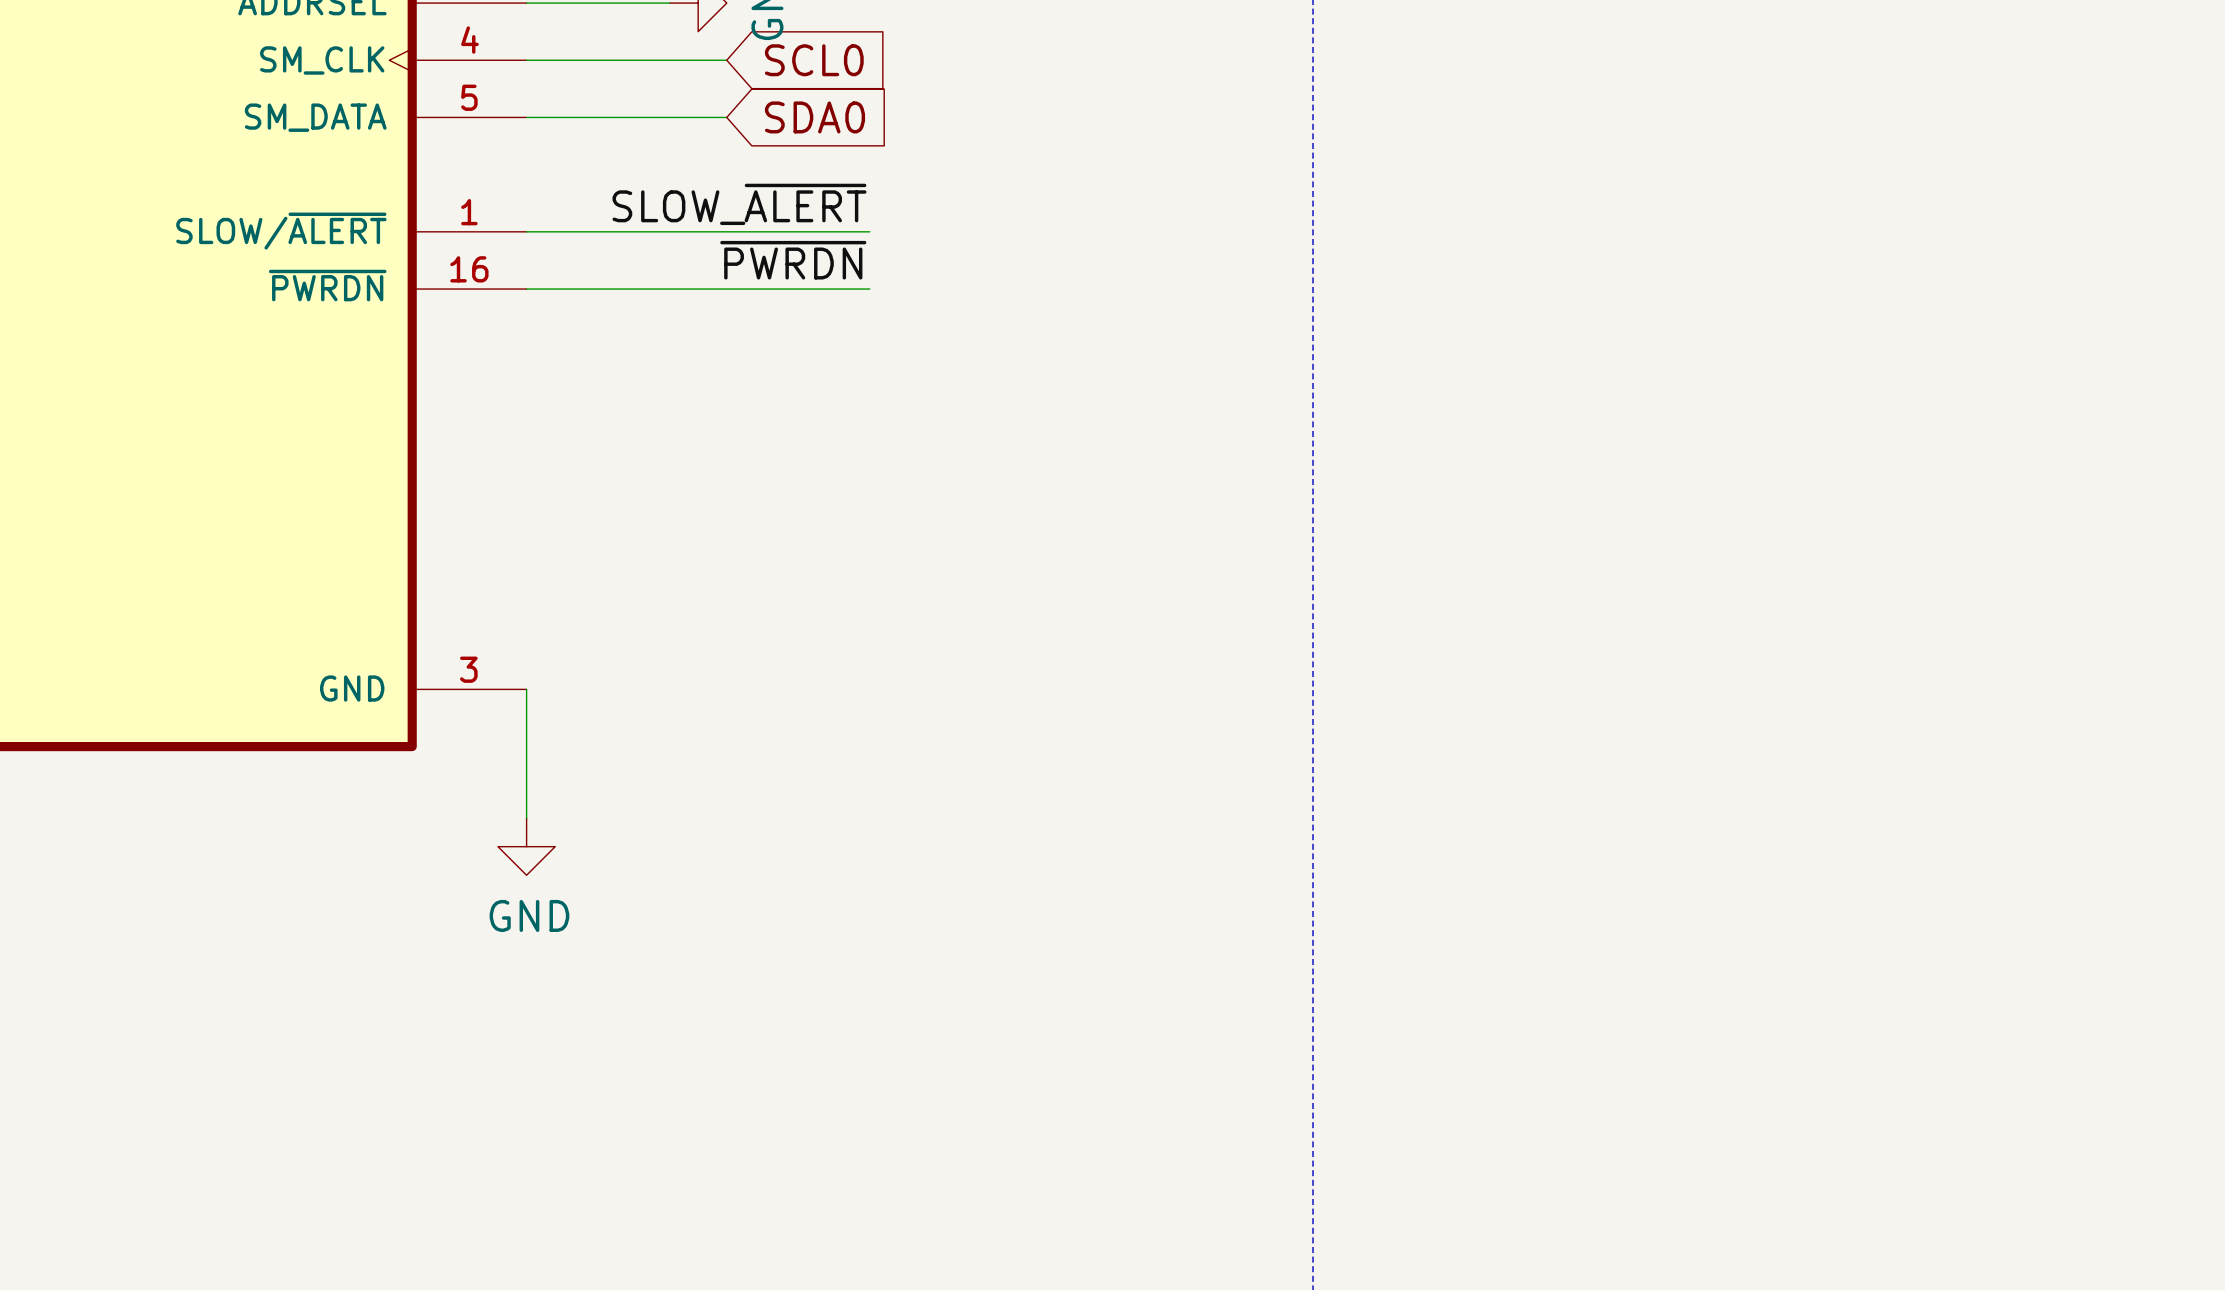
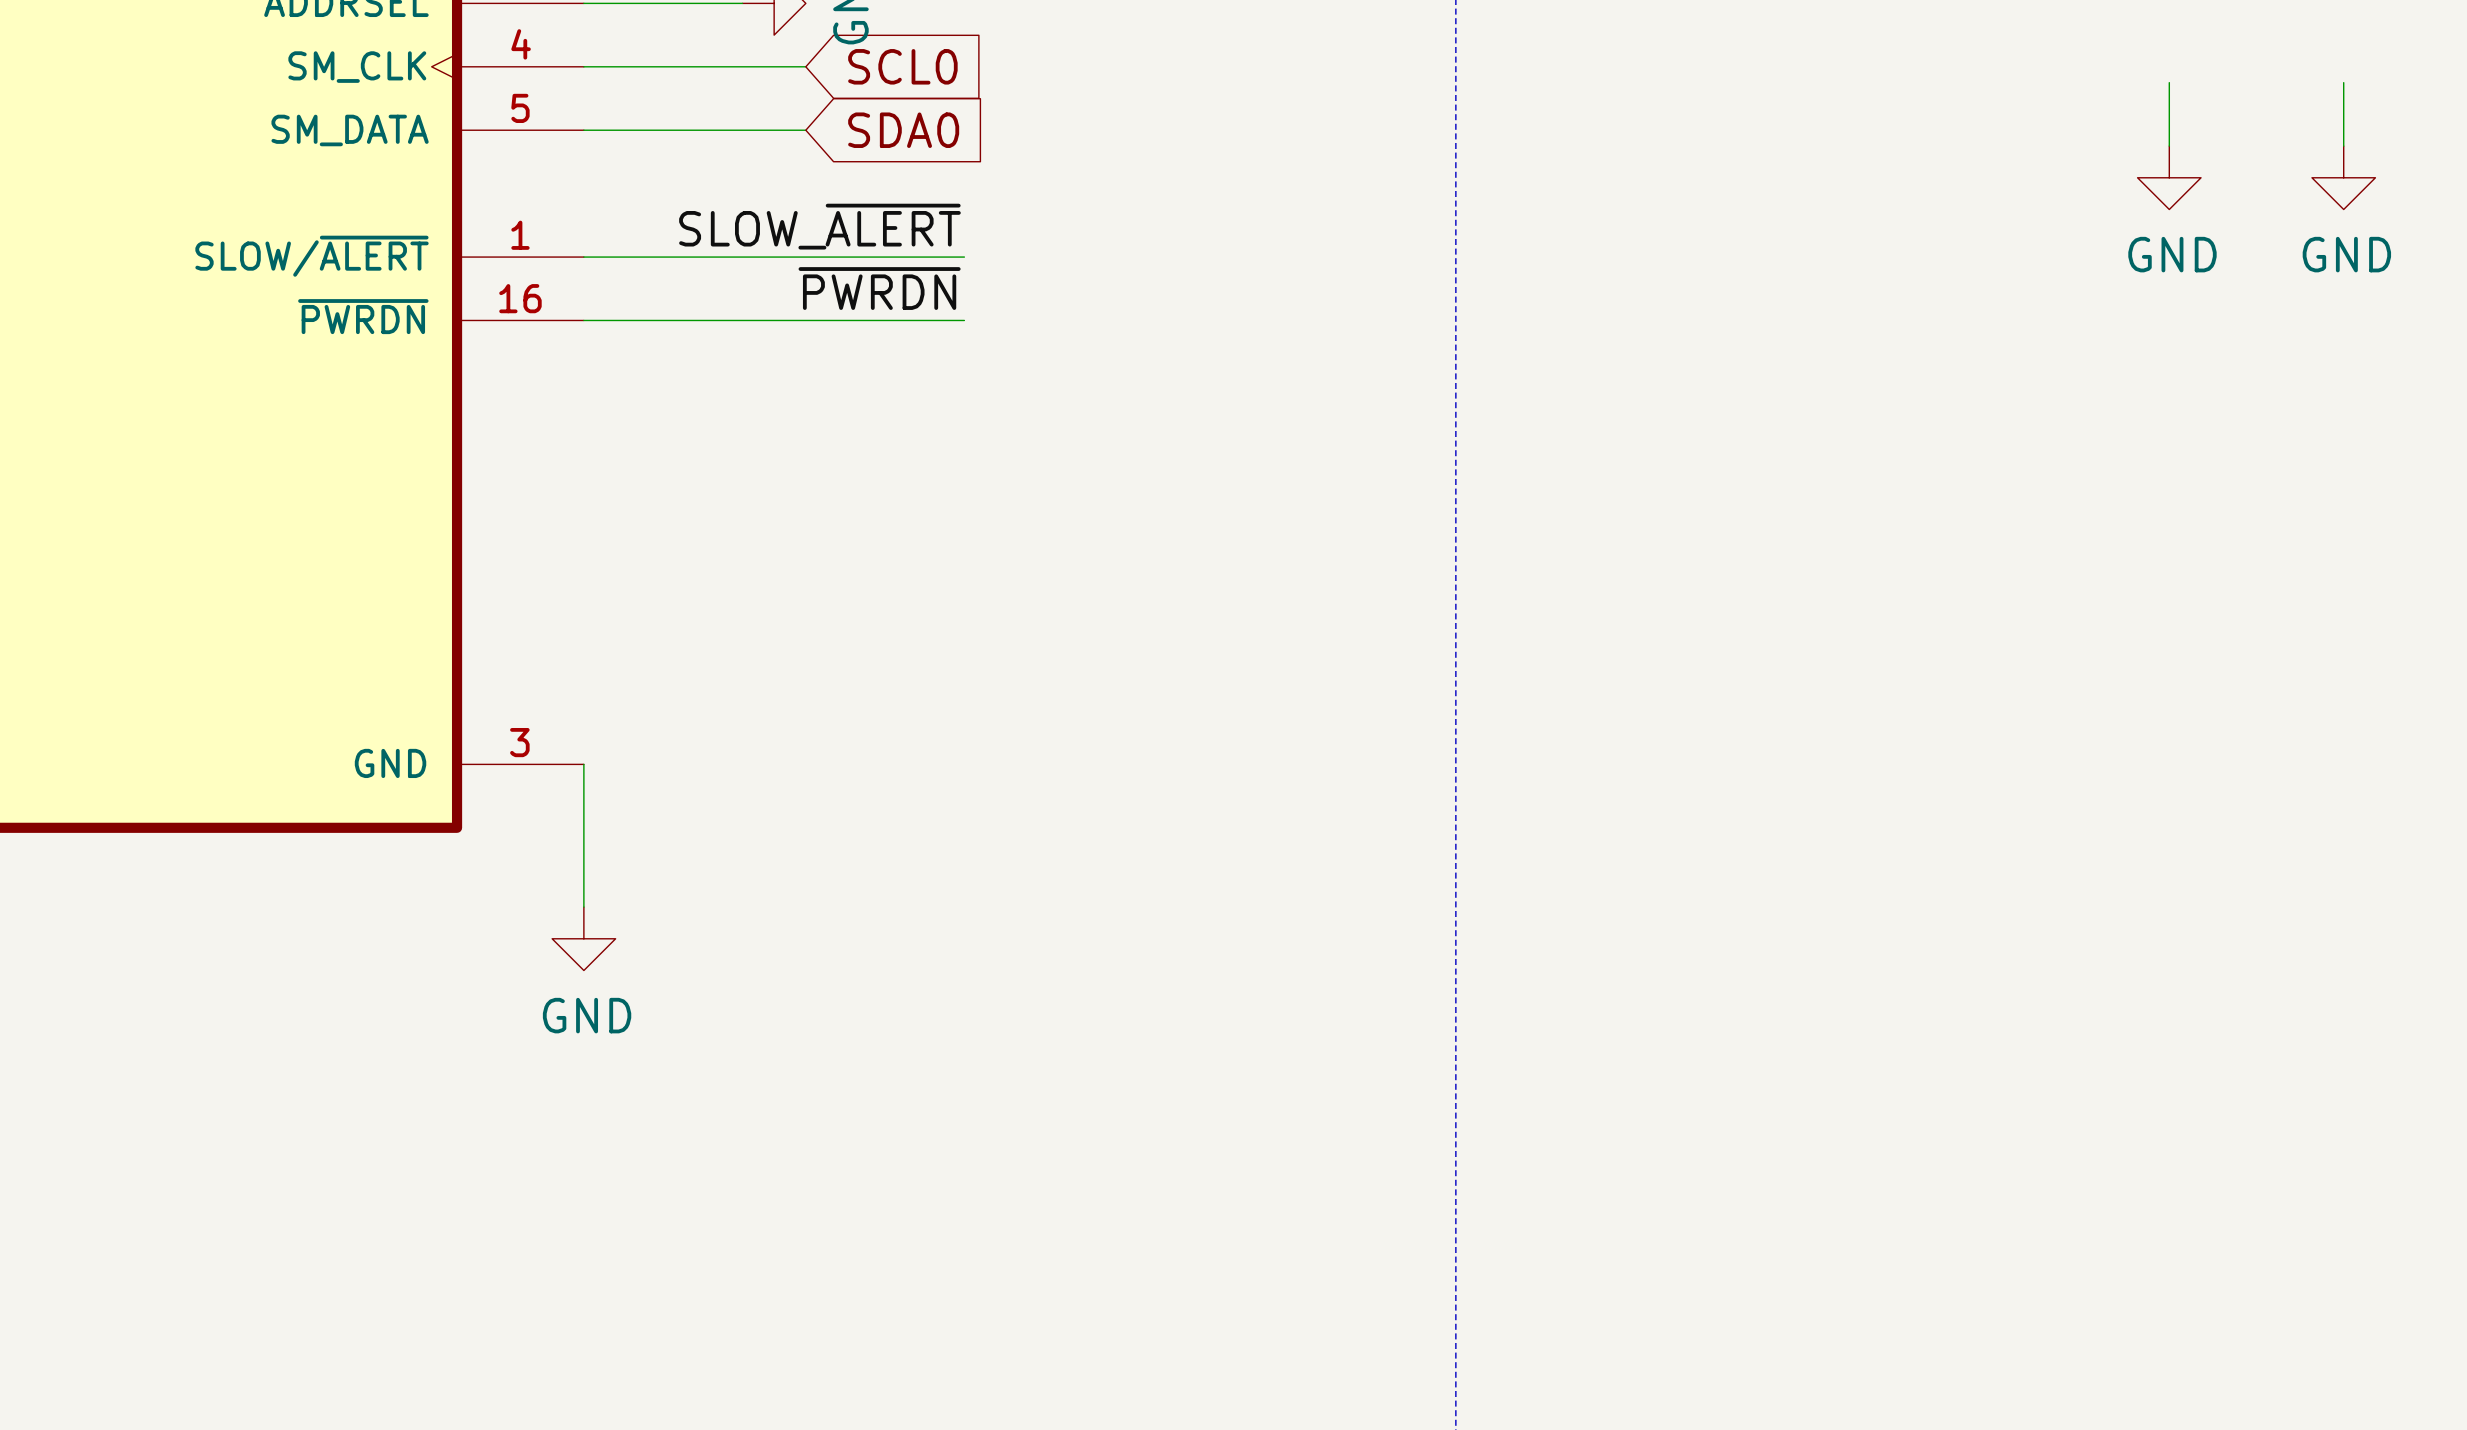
wire: none -> (2169, 82) (2169, 146)
wire: none -> (2343, 82) (2343, 146)
power symbol: none -> GND (2169, 177)
power symbol: none -> GND (2343, 177)

